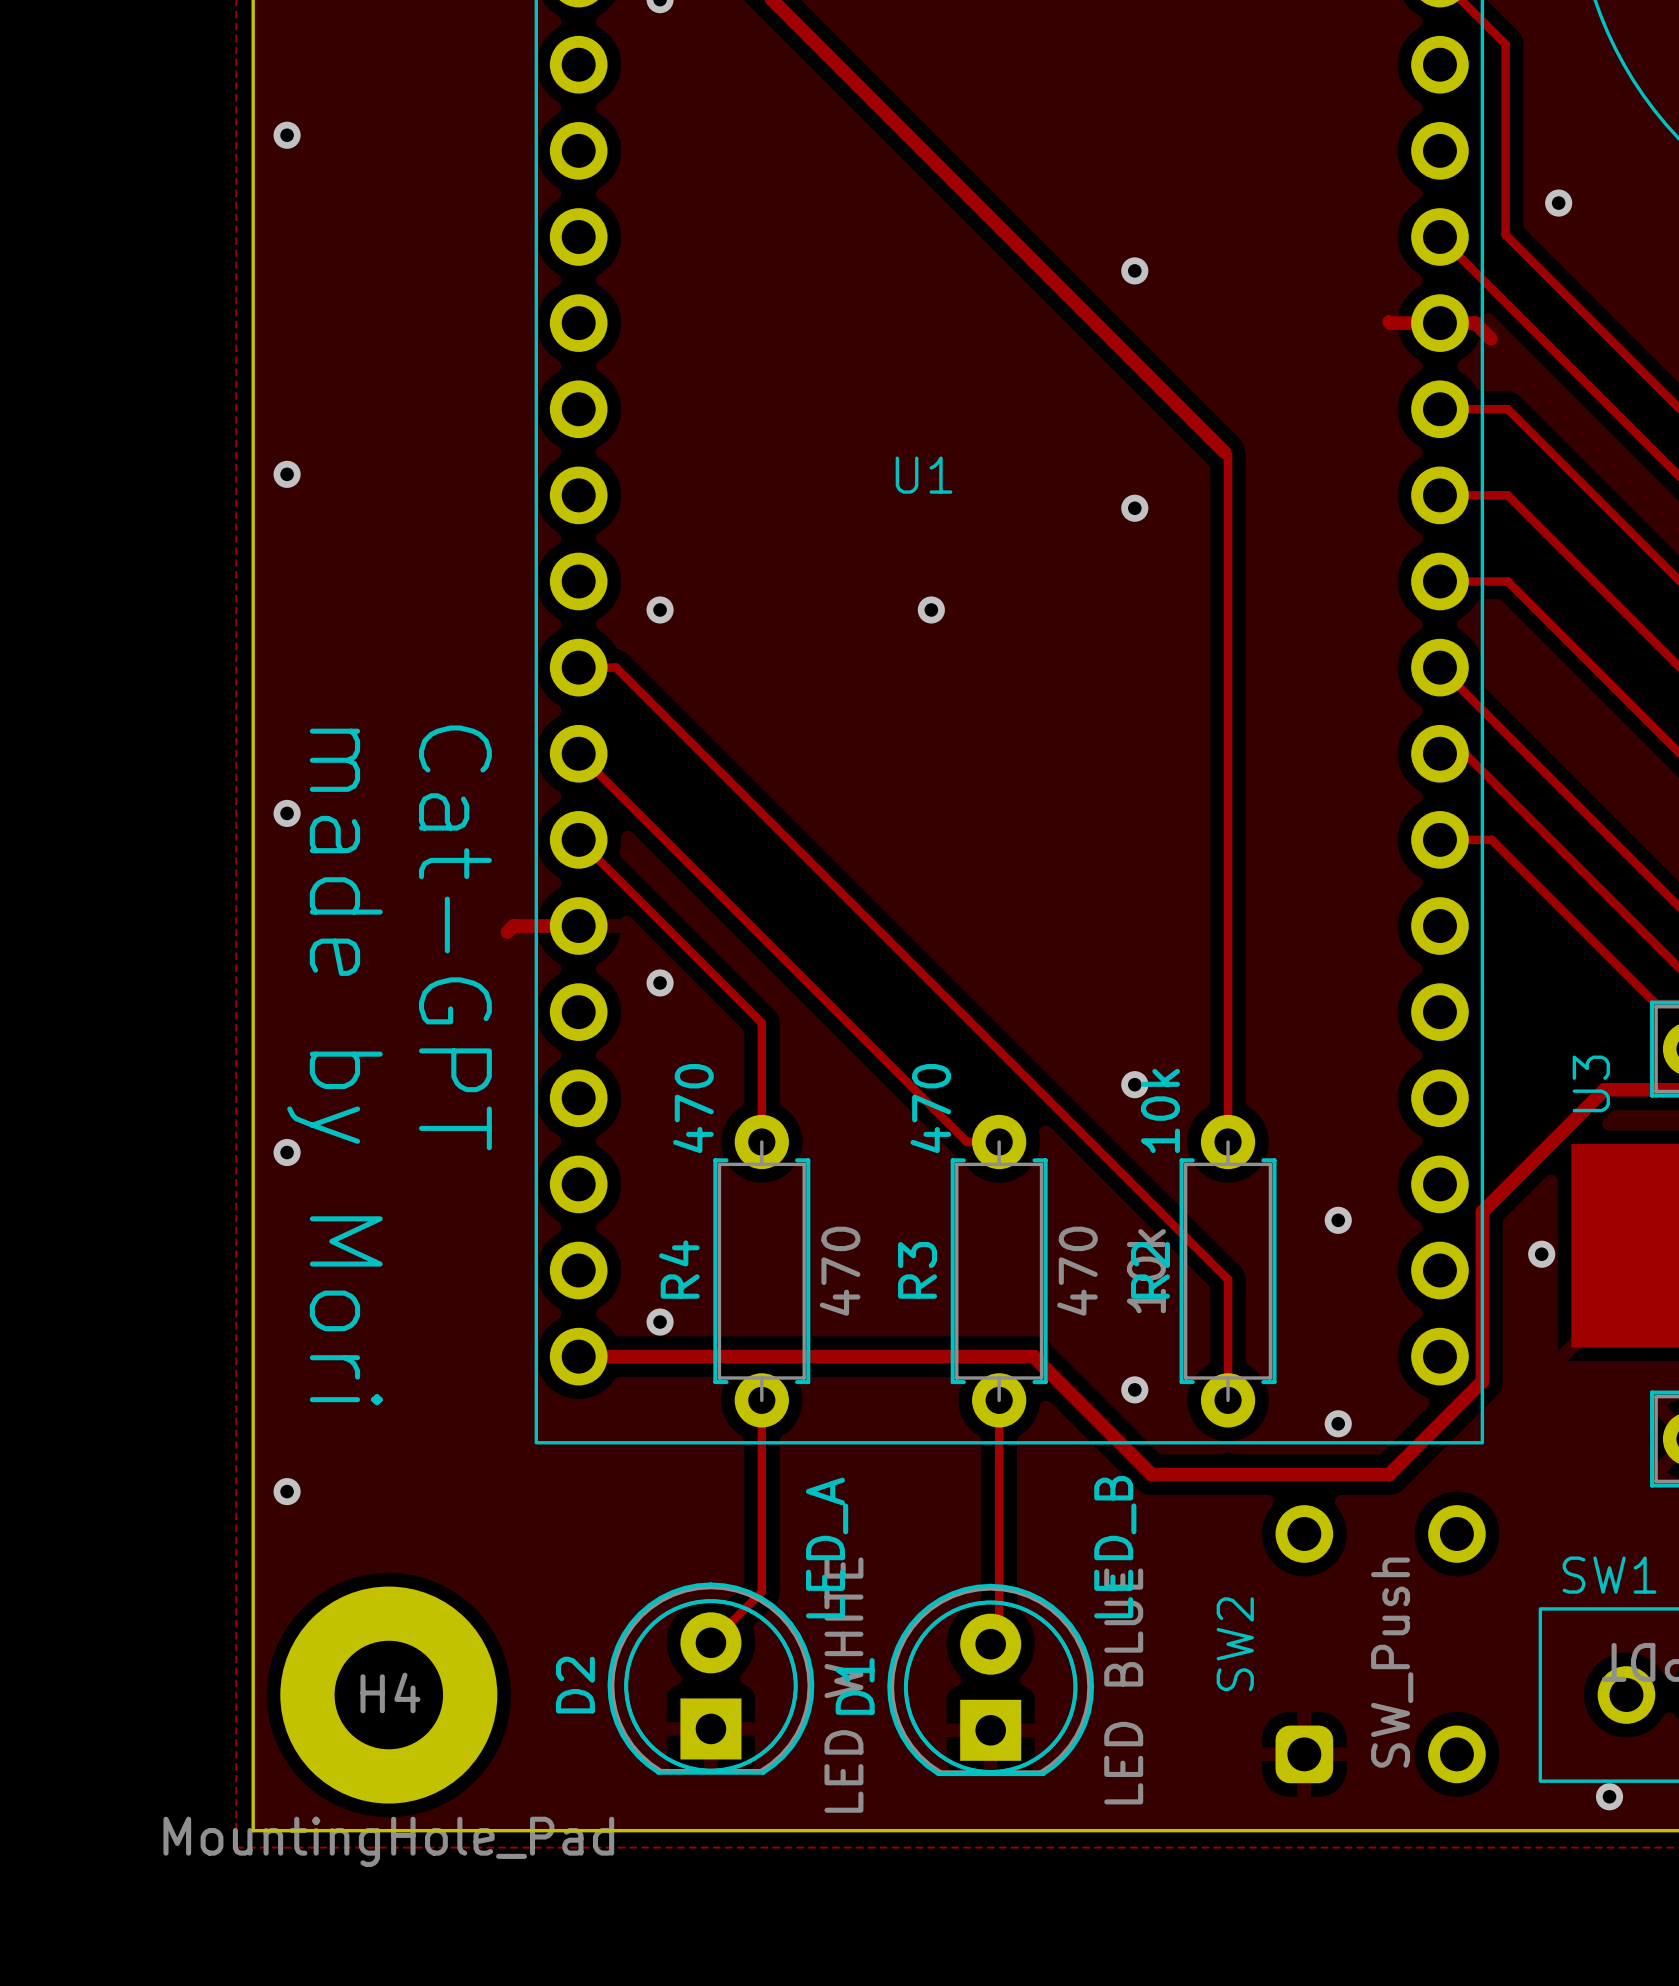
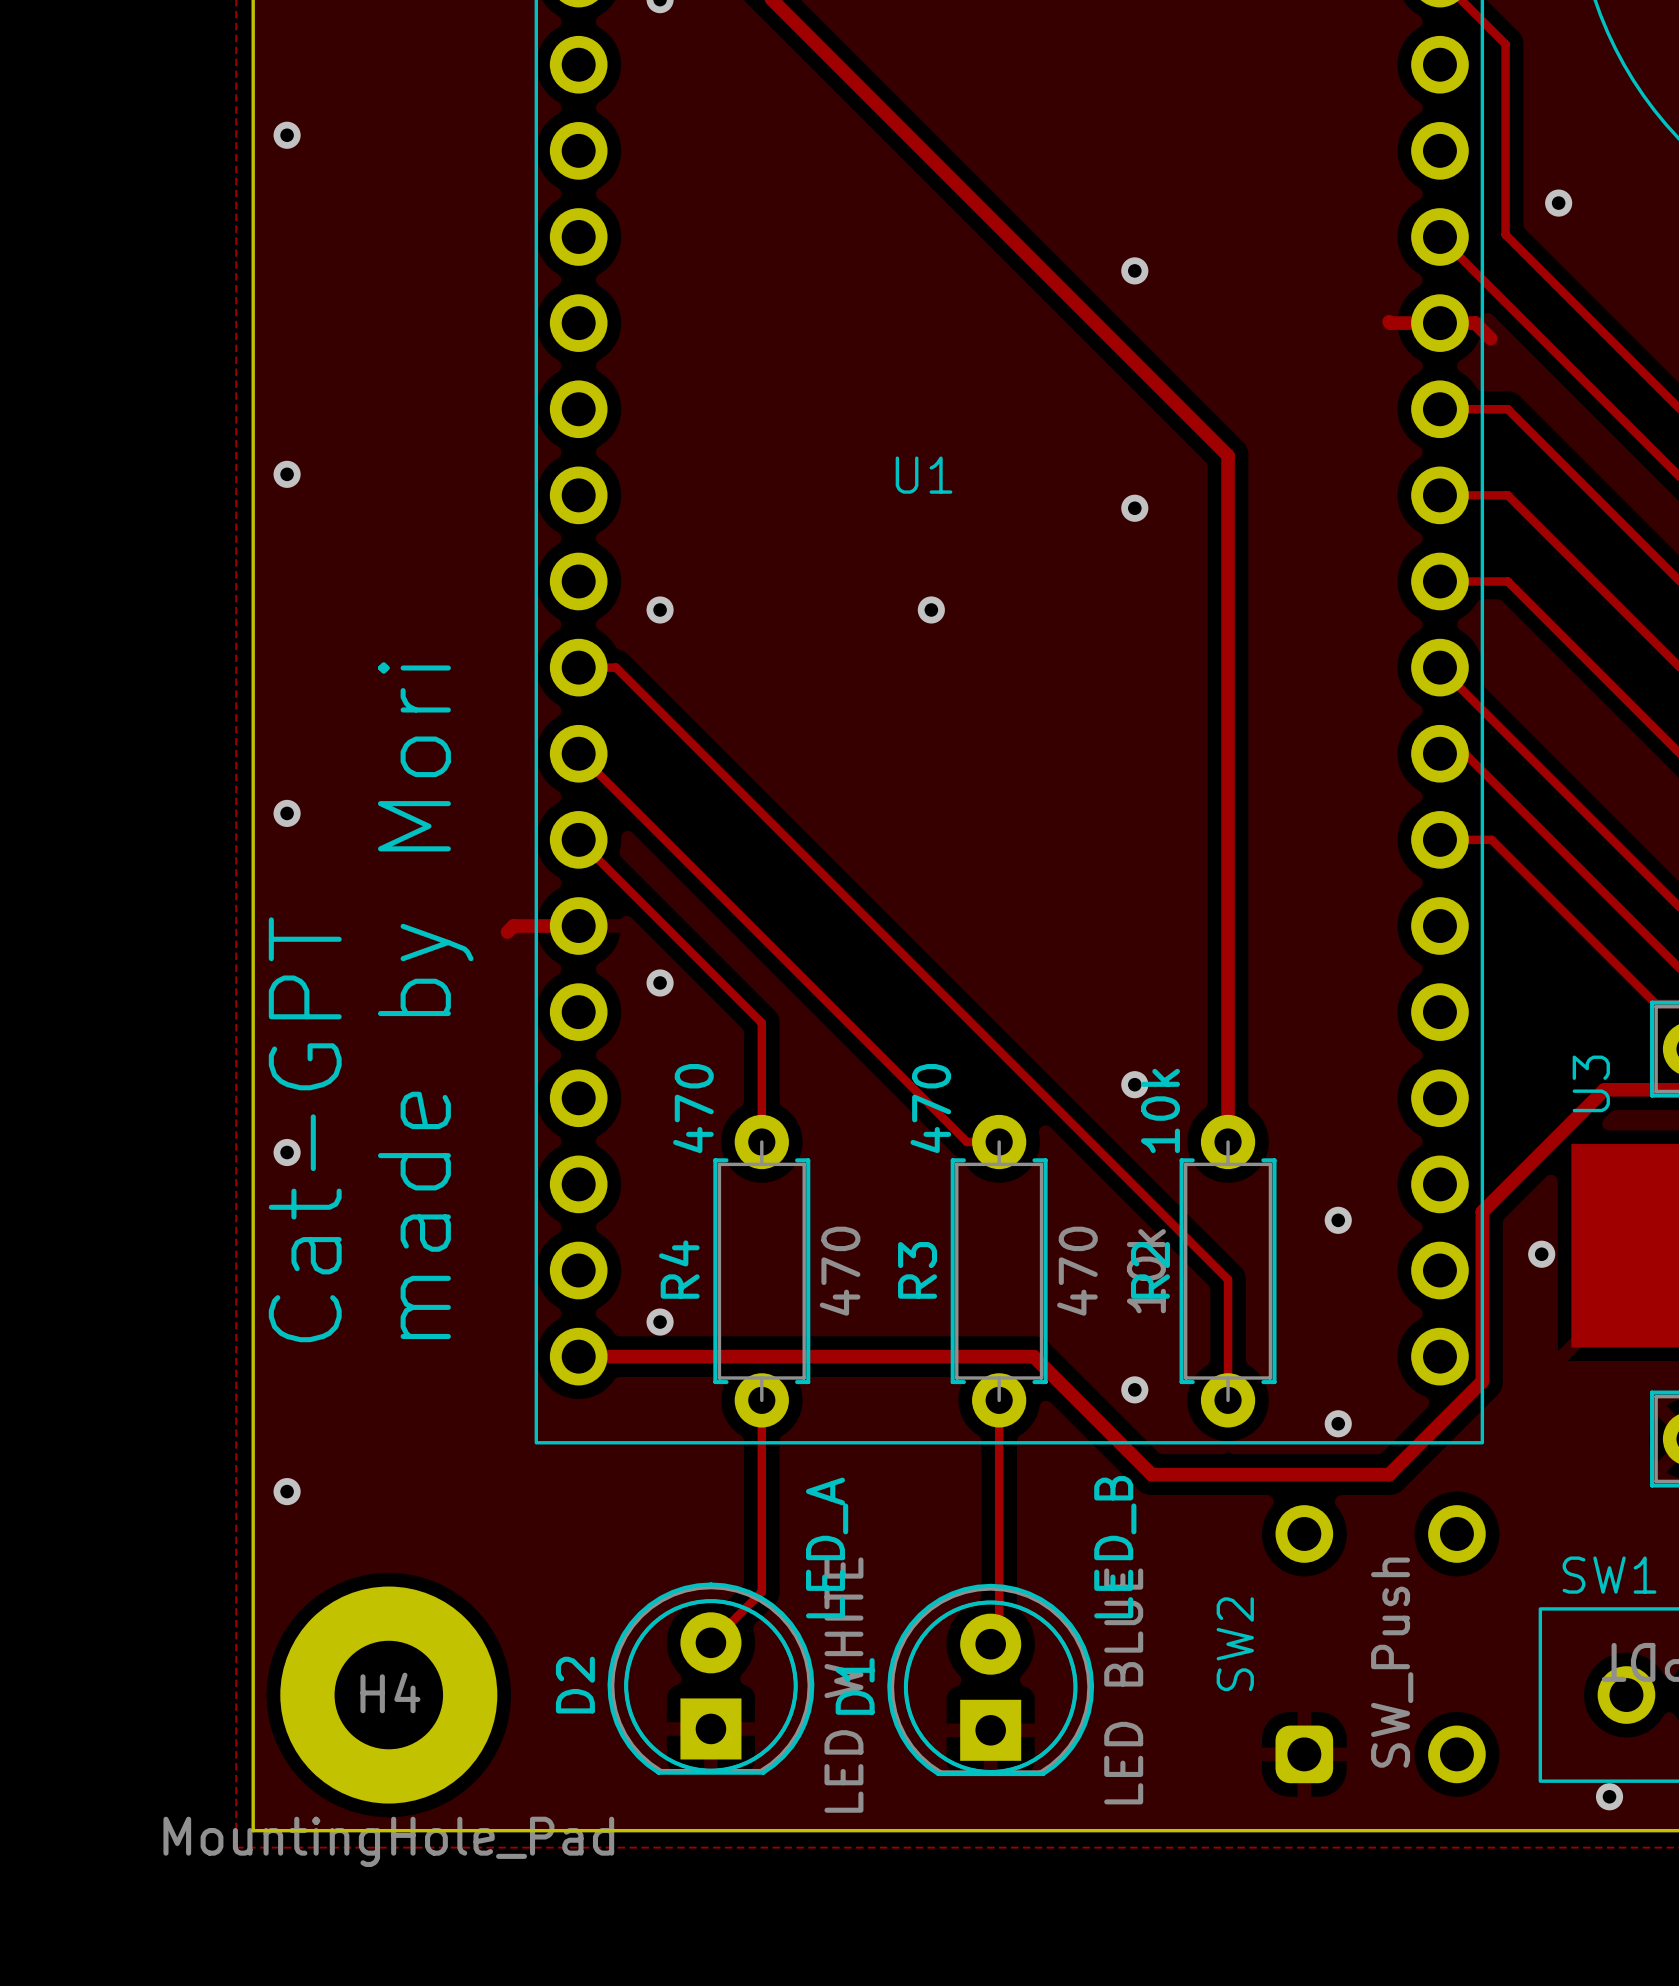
track width: thin (1224, 452) (1228, 455) (1228, 1142) -> thick (1224, 452) (1228, 455) (1228, 1142)
text rotation: 0° (455, 937) -> 180° (305, 1129)
text rotation: 0° (334, 1067) -> 180° (425, 1000)

